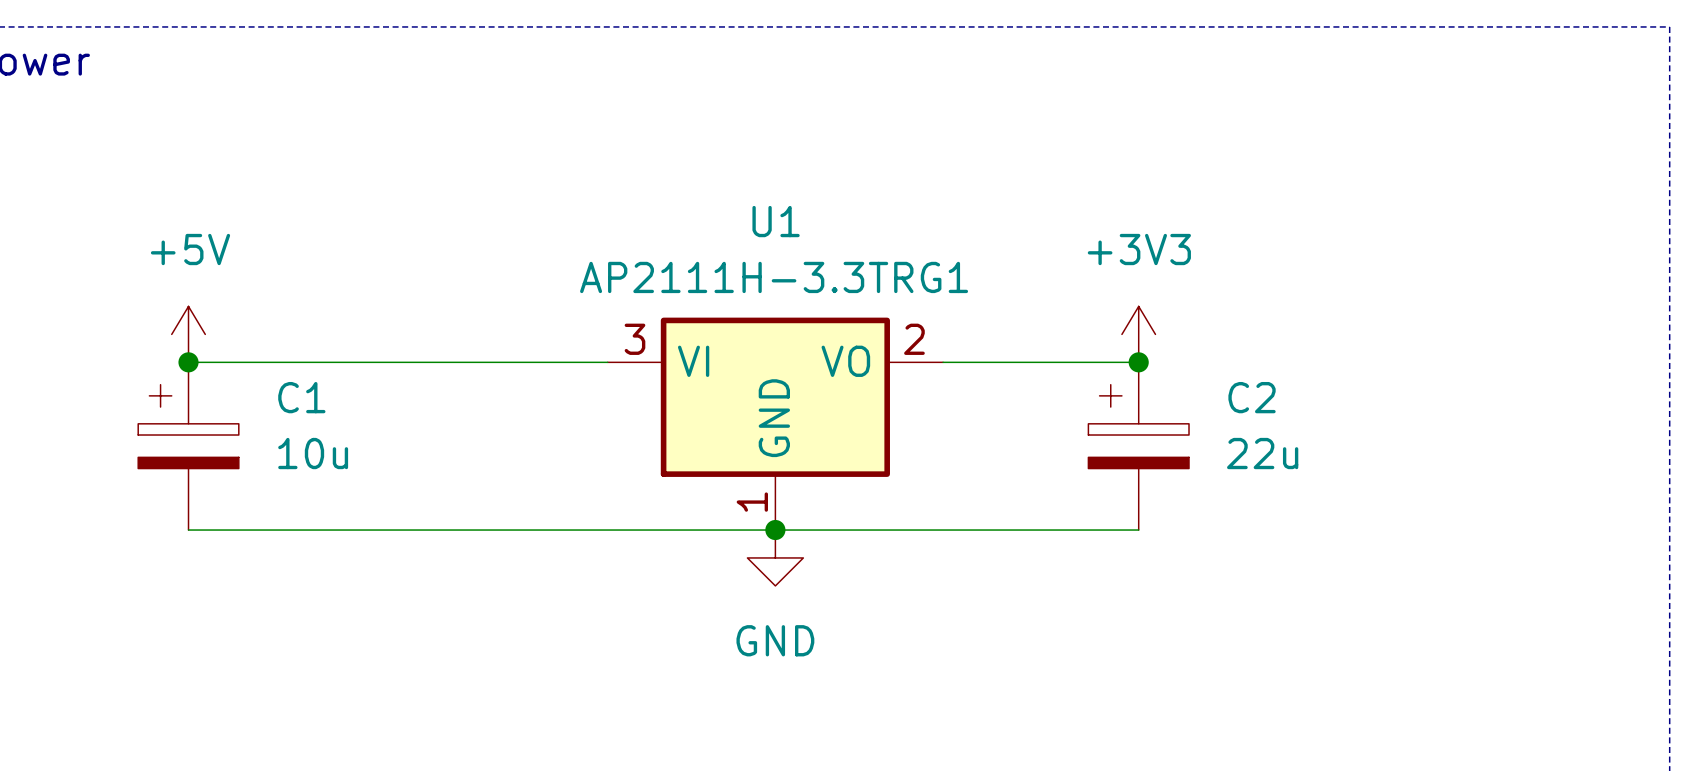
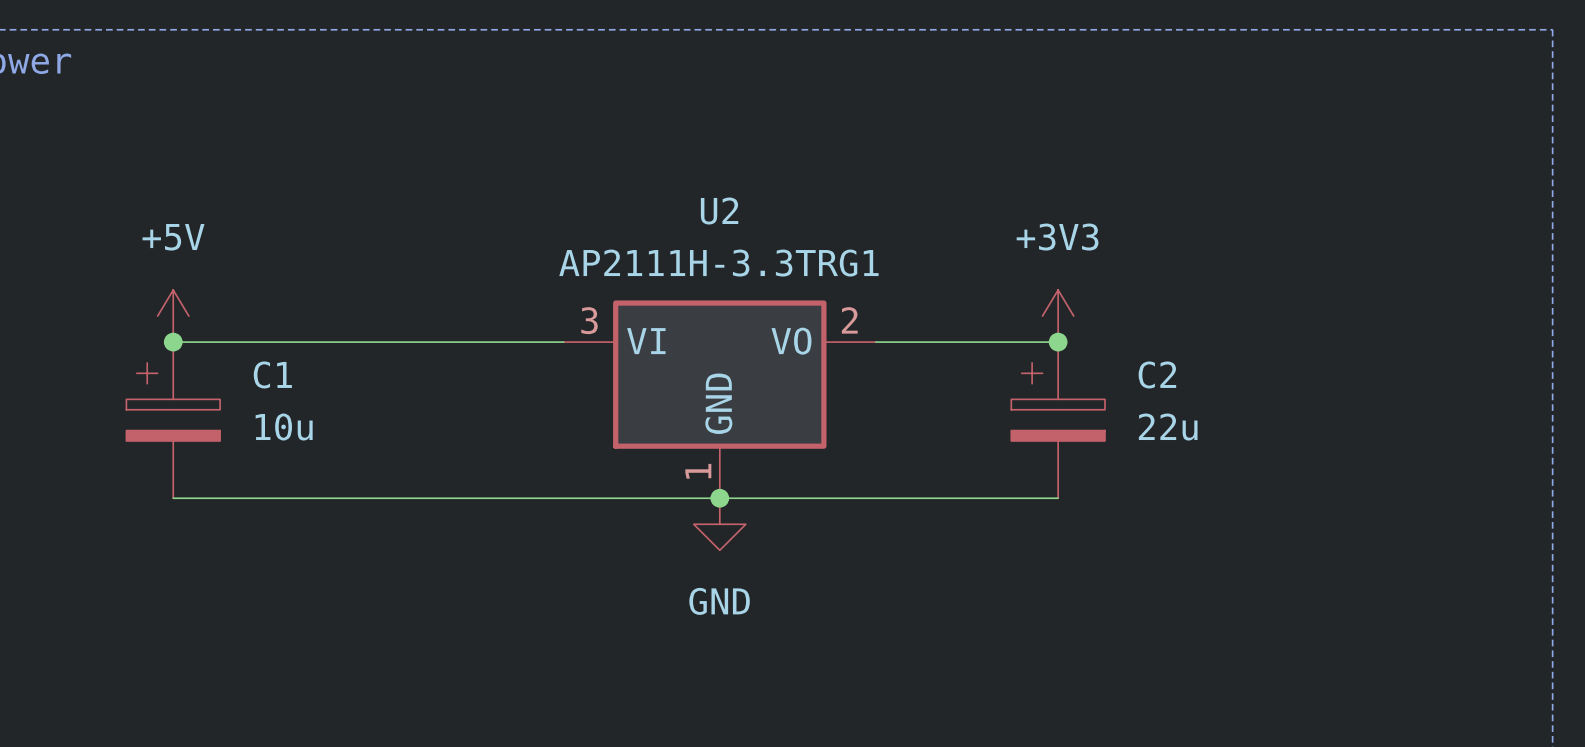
U1 name: U1 (776, 221) -> U2 (719, 211)

